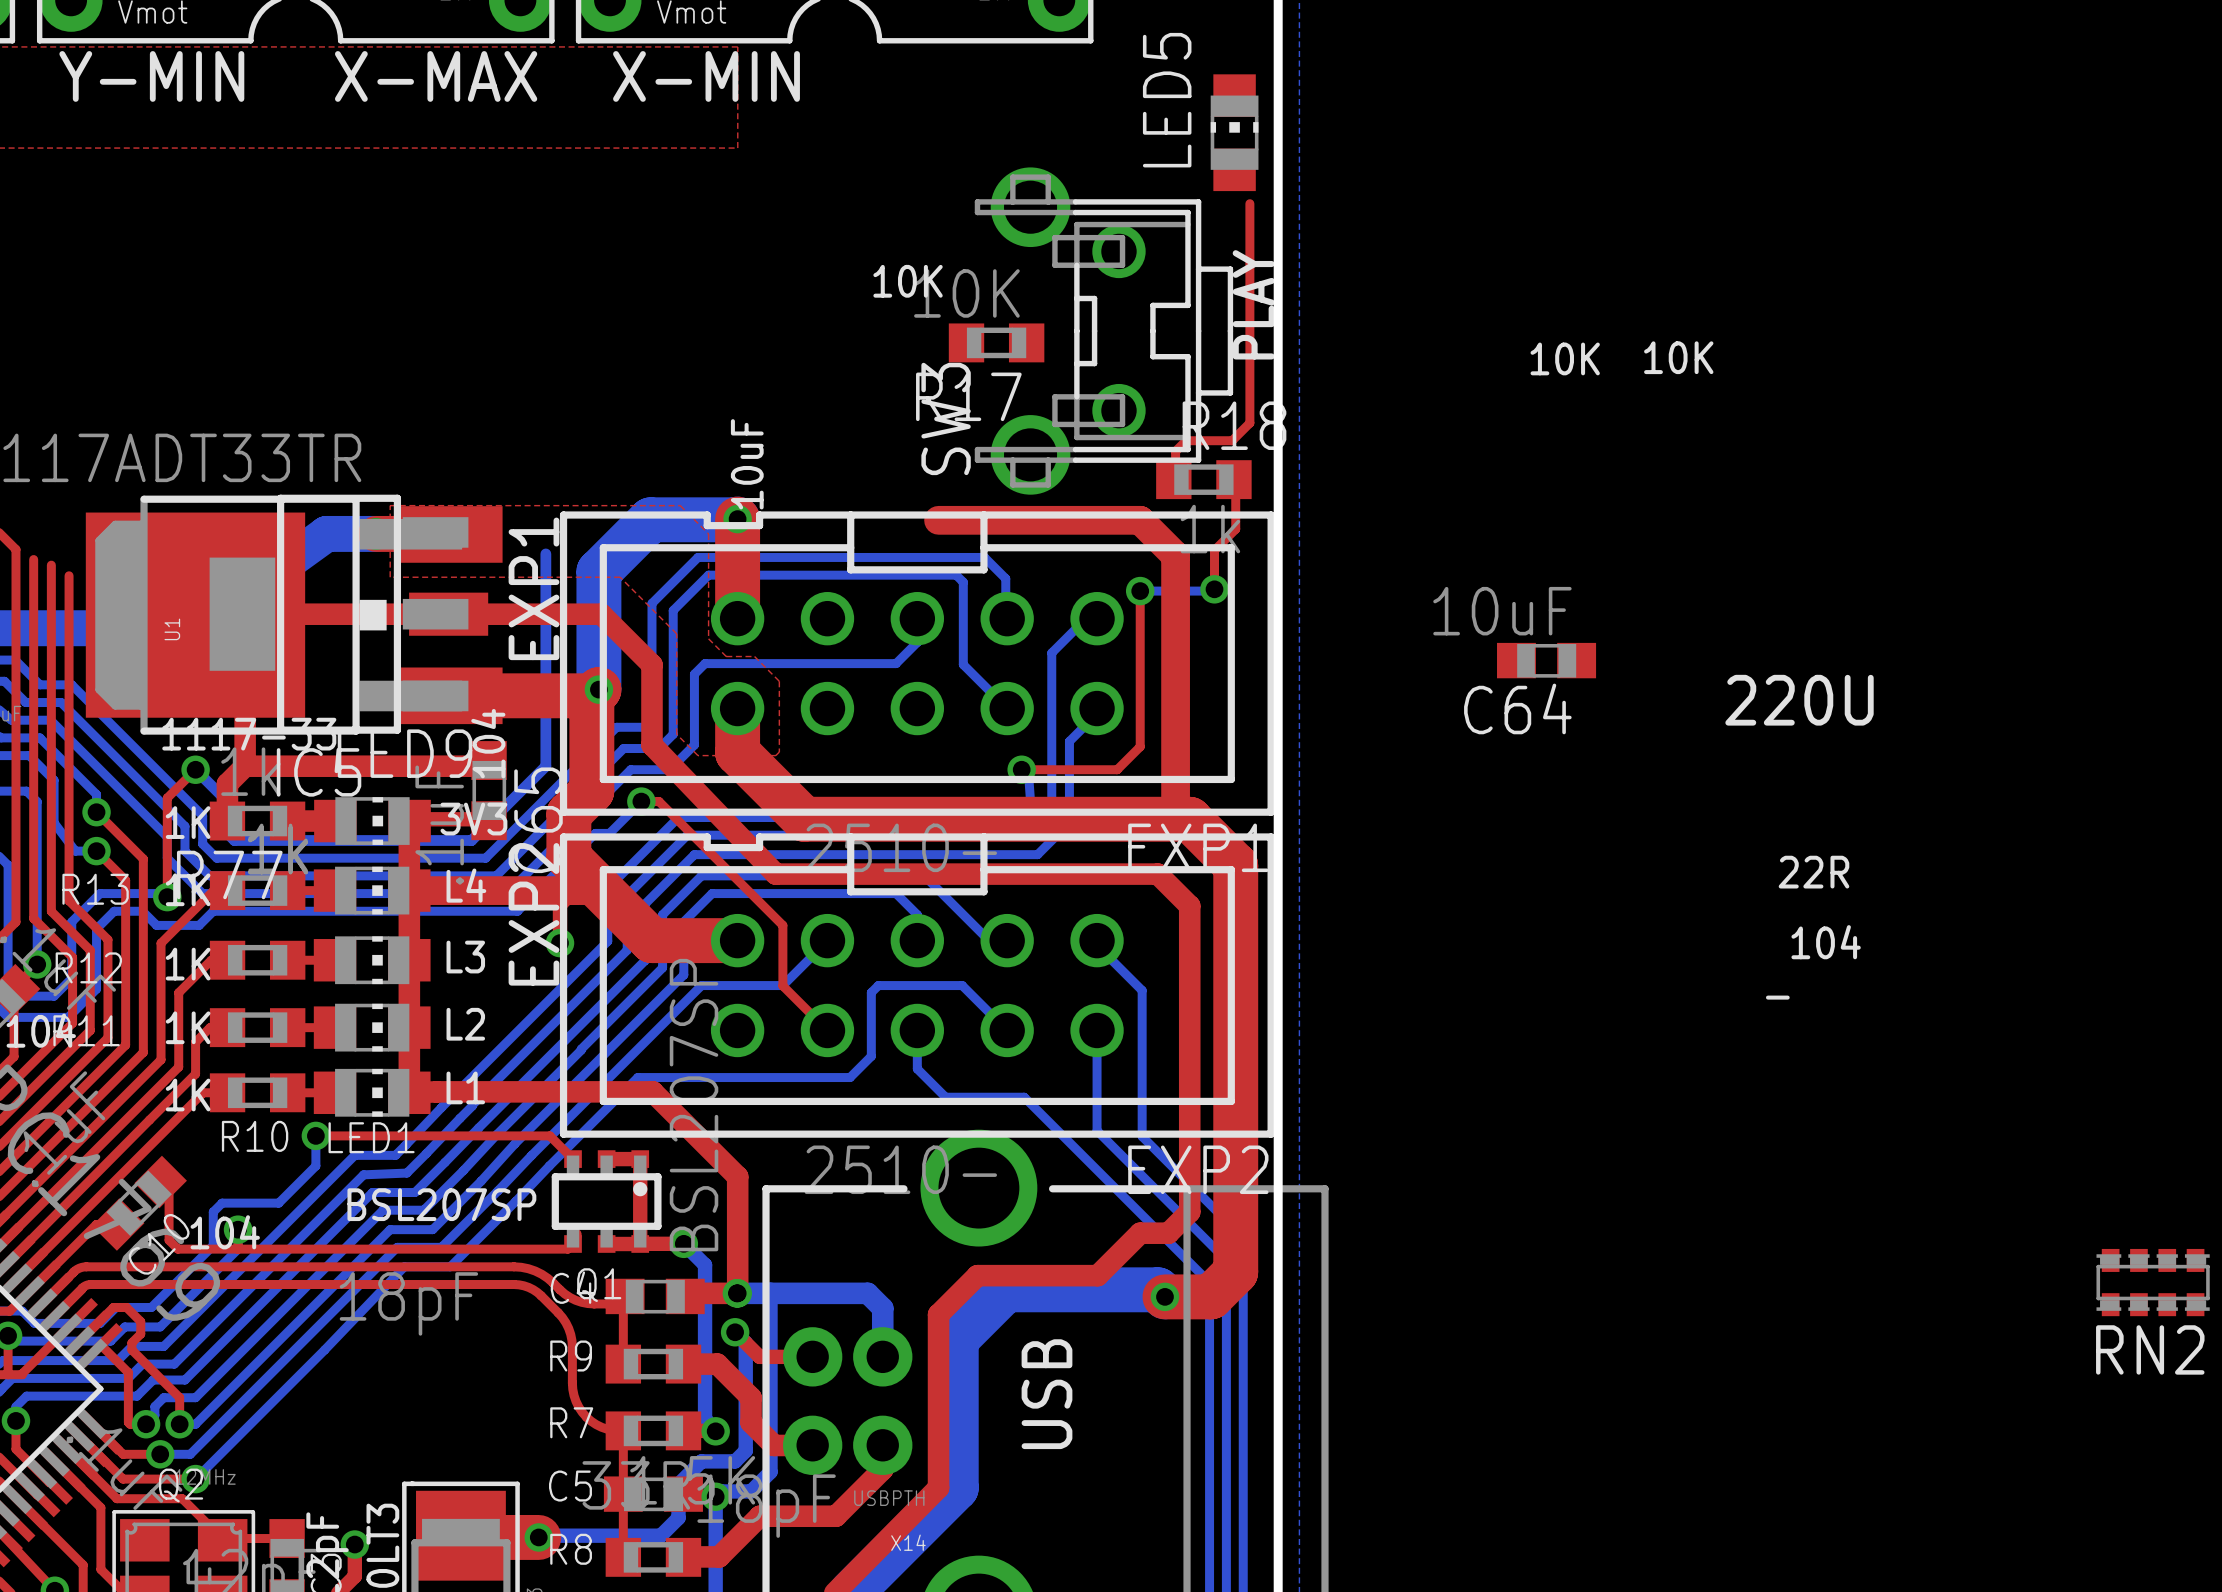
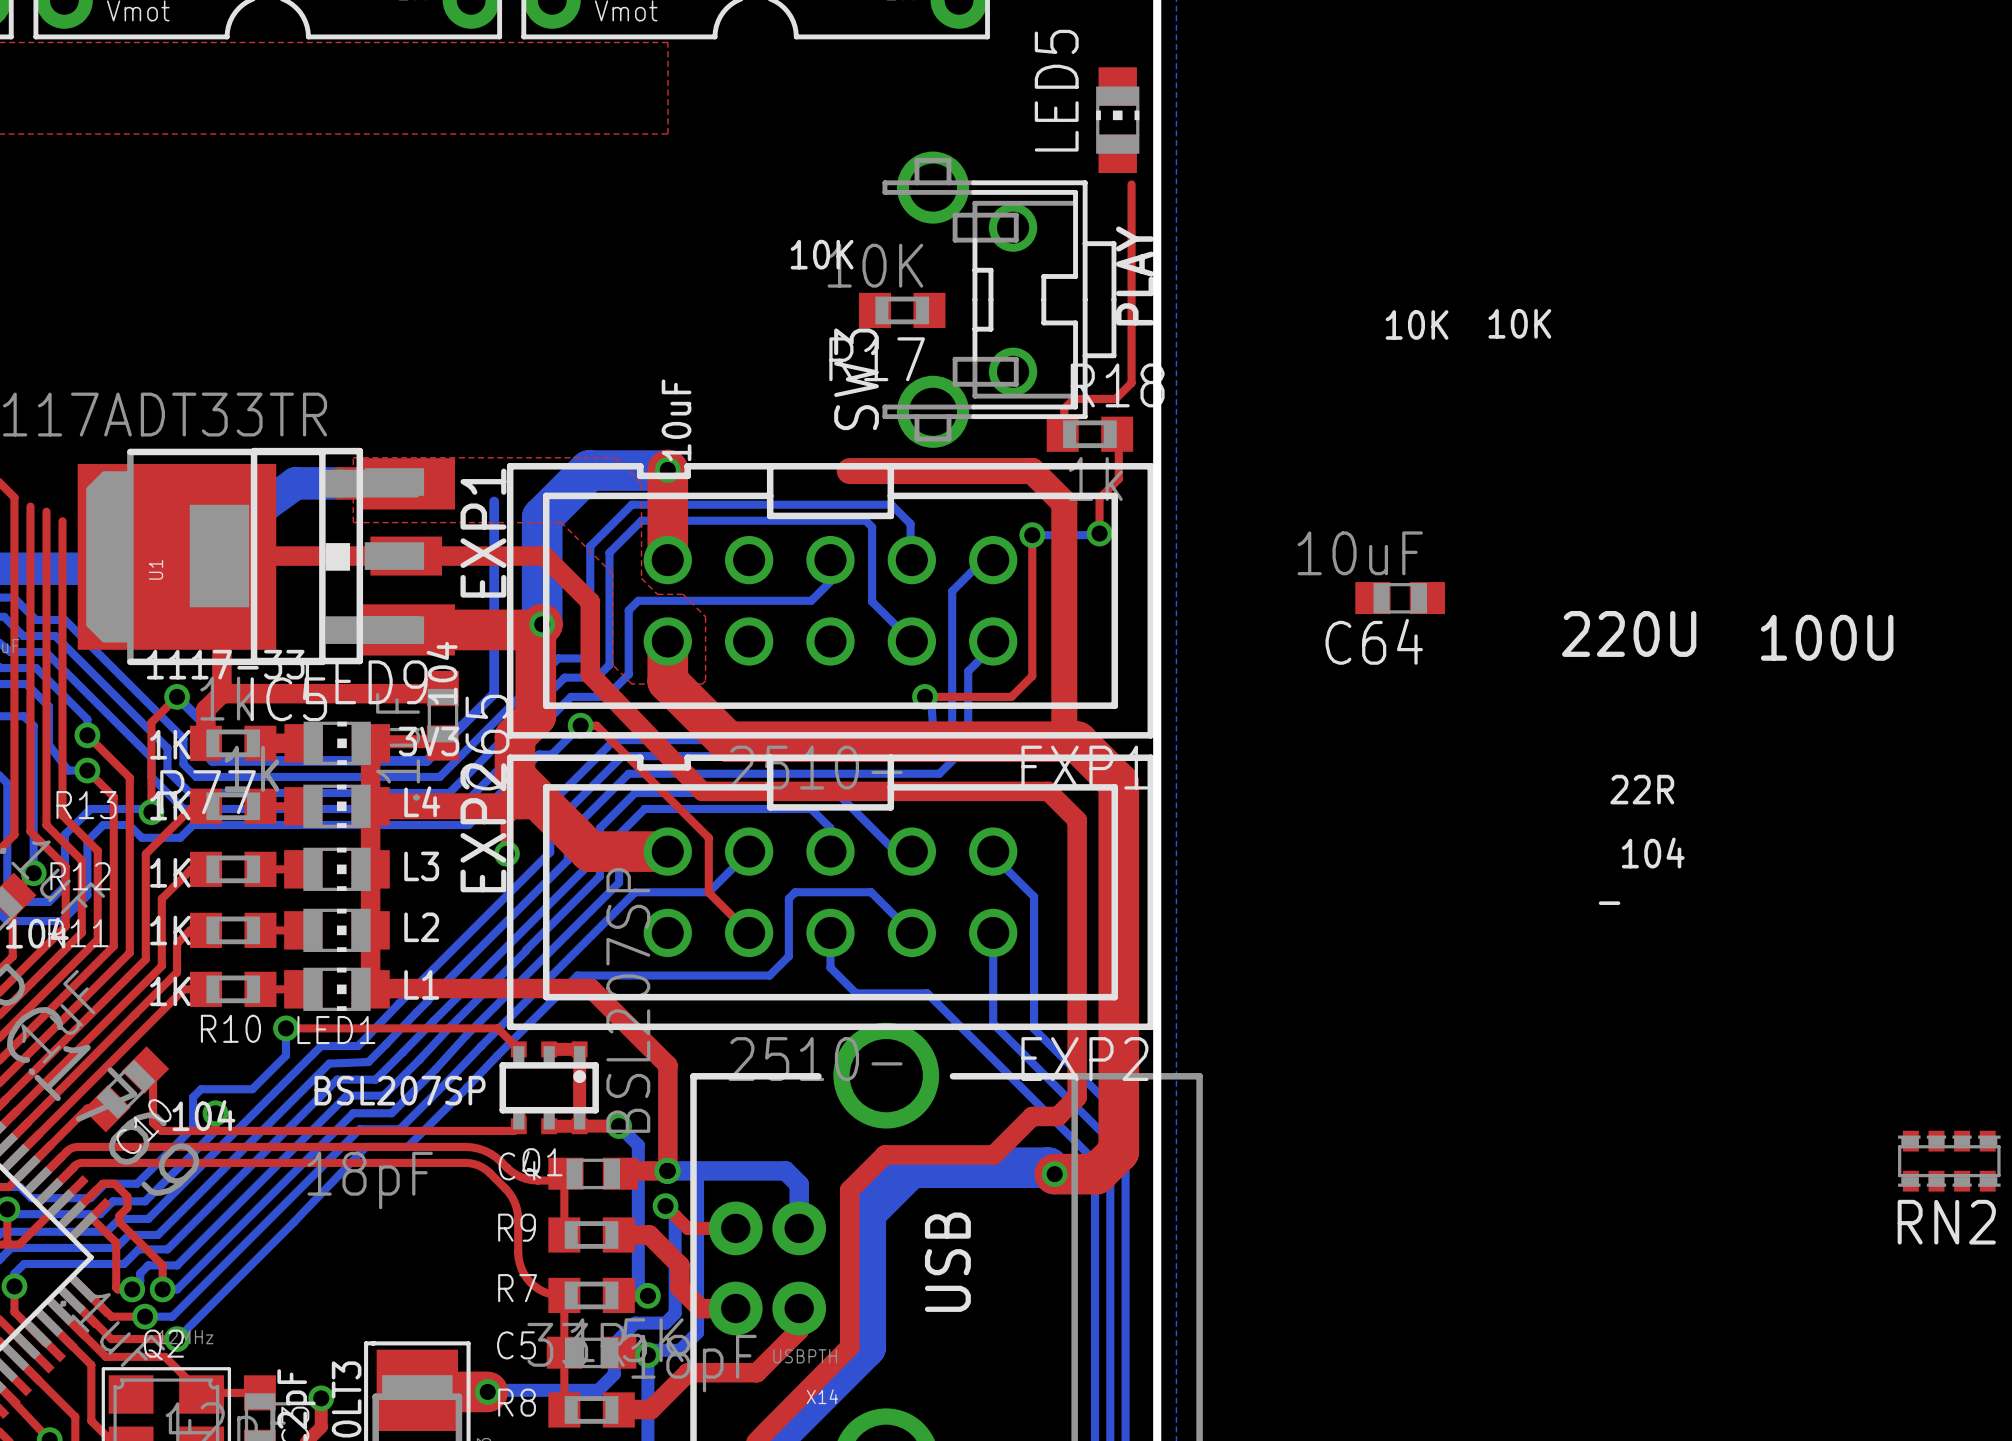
text: Y-MIN (151, 76) -> none
text: X-MAX (436, 76) -> none
text: X-MIN (706, 76) -> none
text: none -> 100U (1827, 637)

